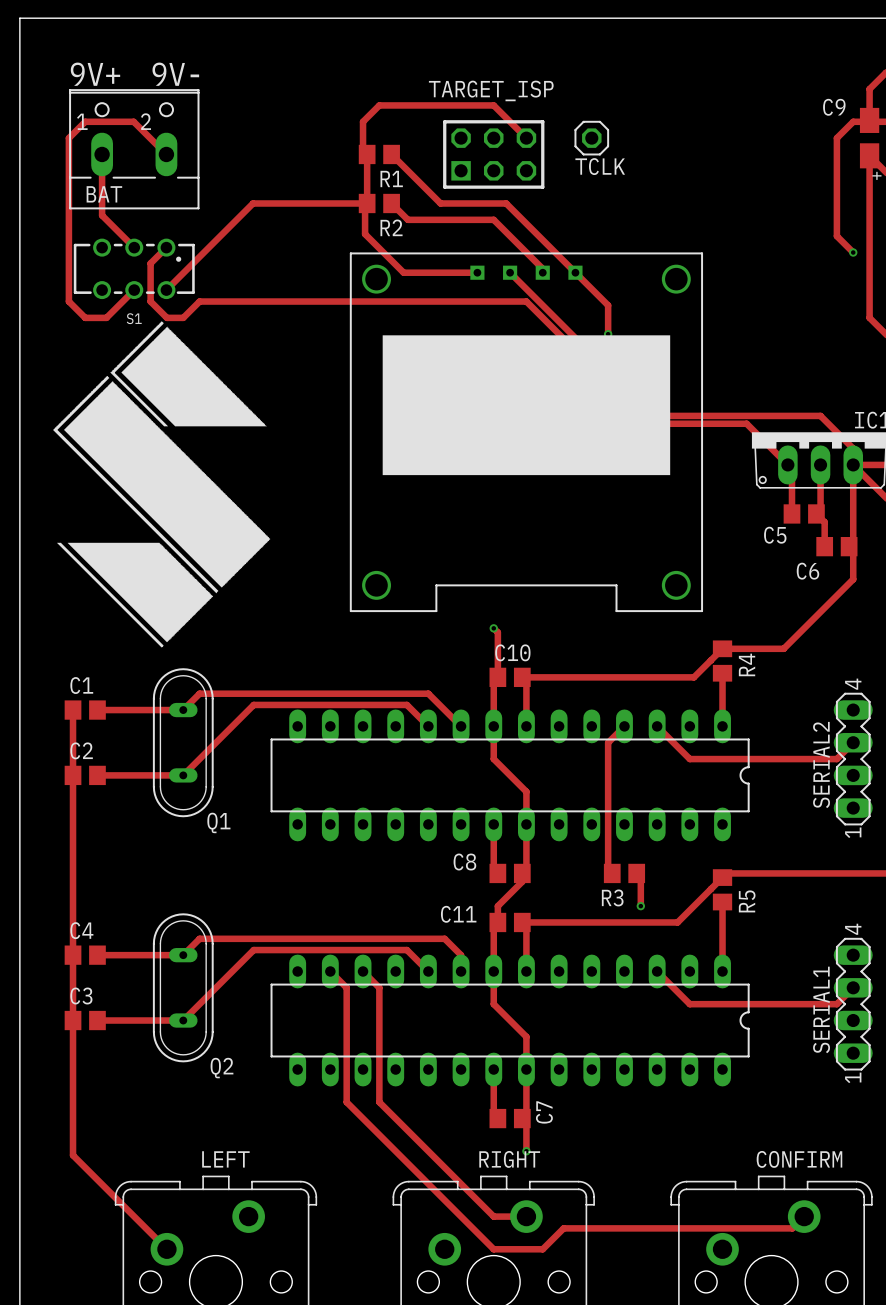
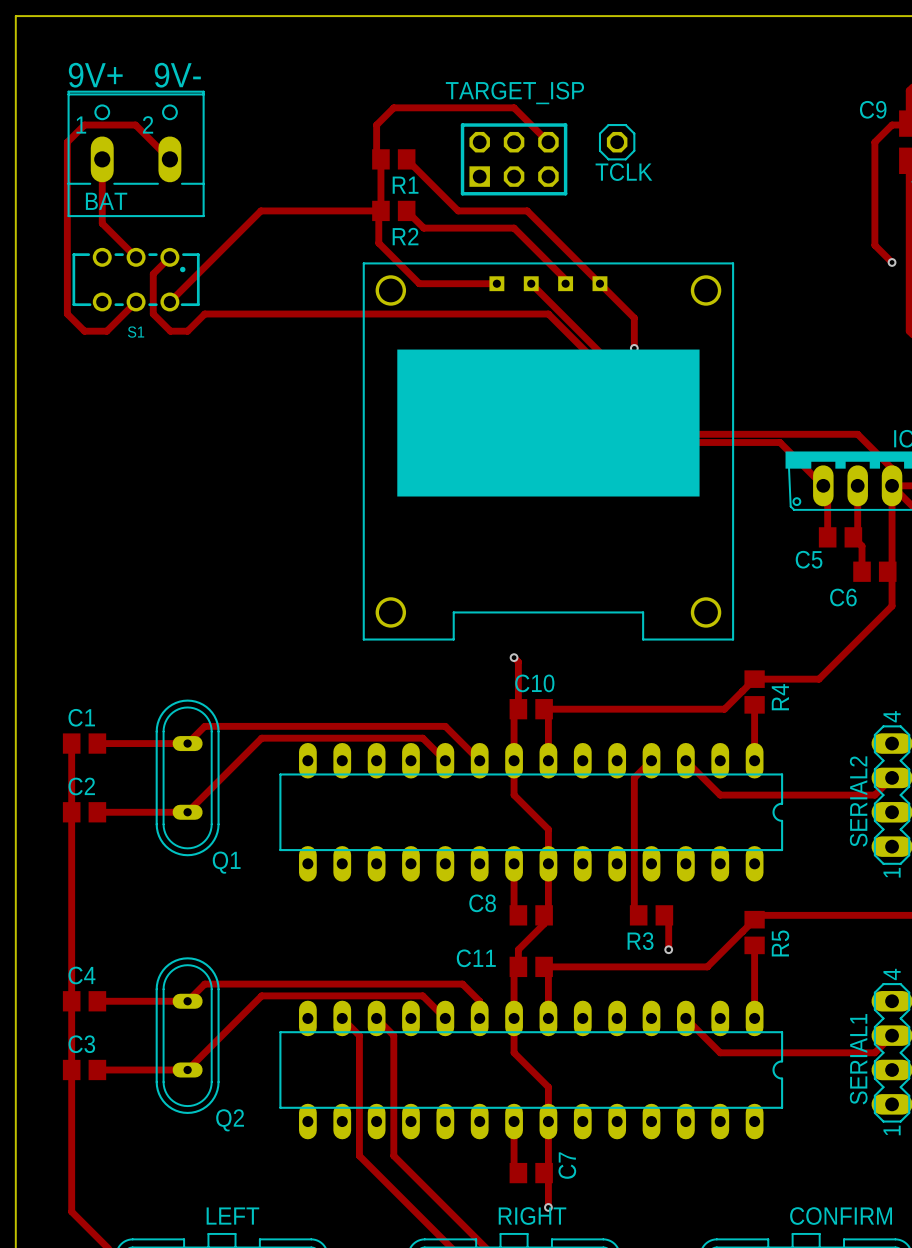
drawing: [53, 321, 271, 648] -> none

